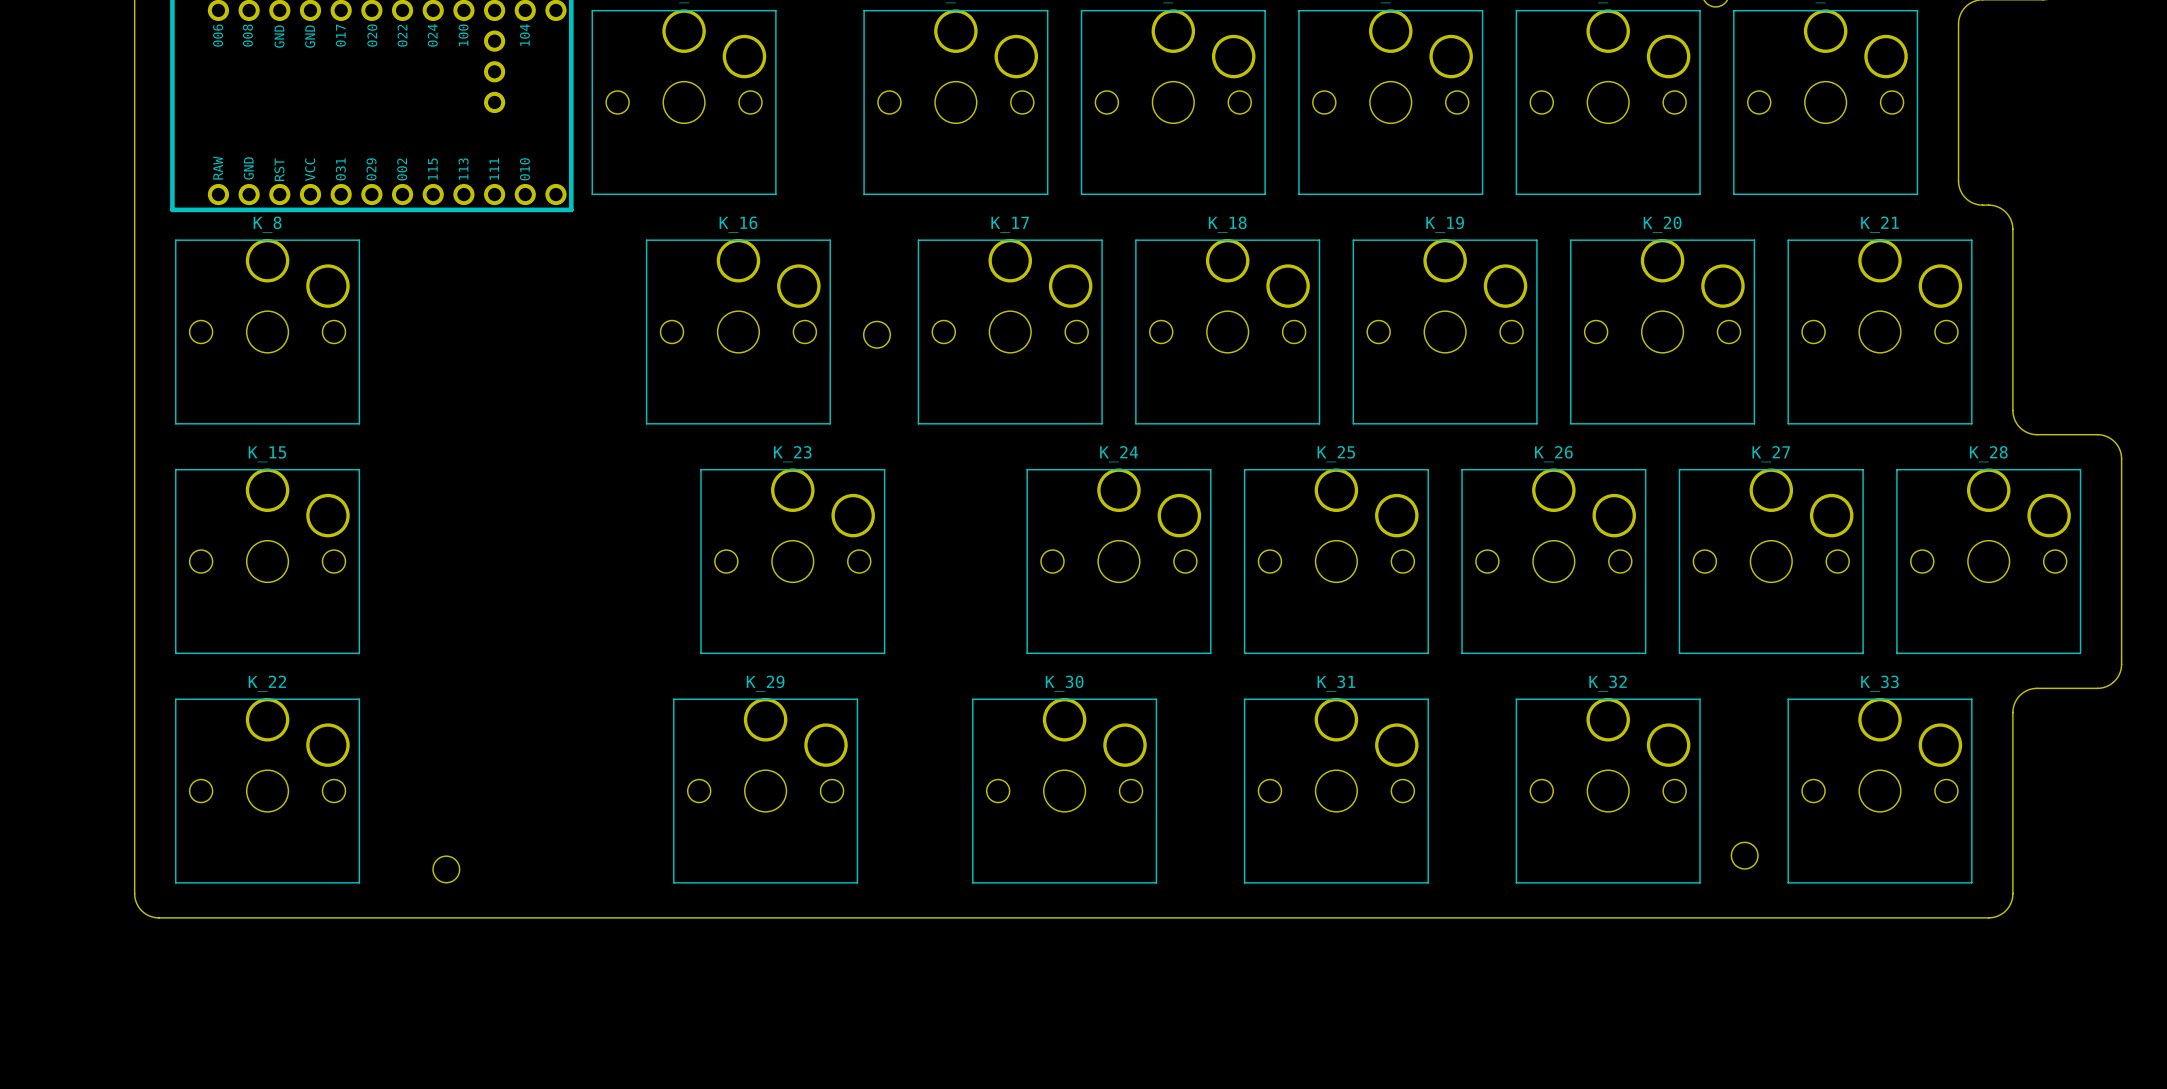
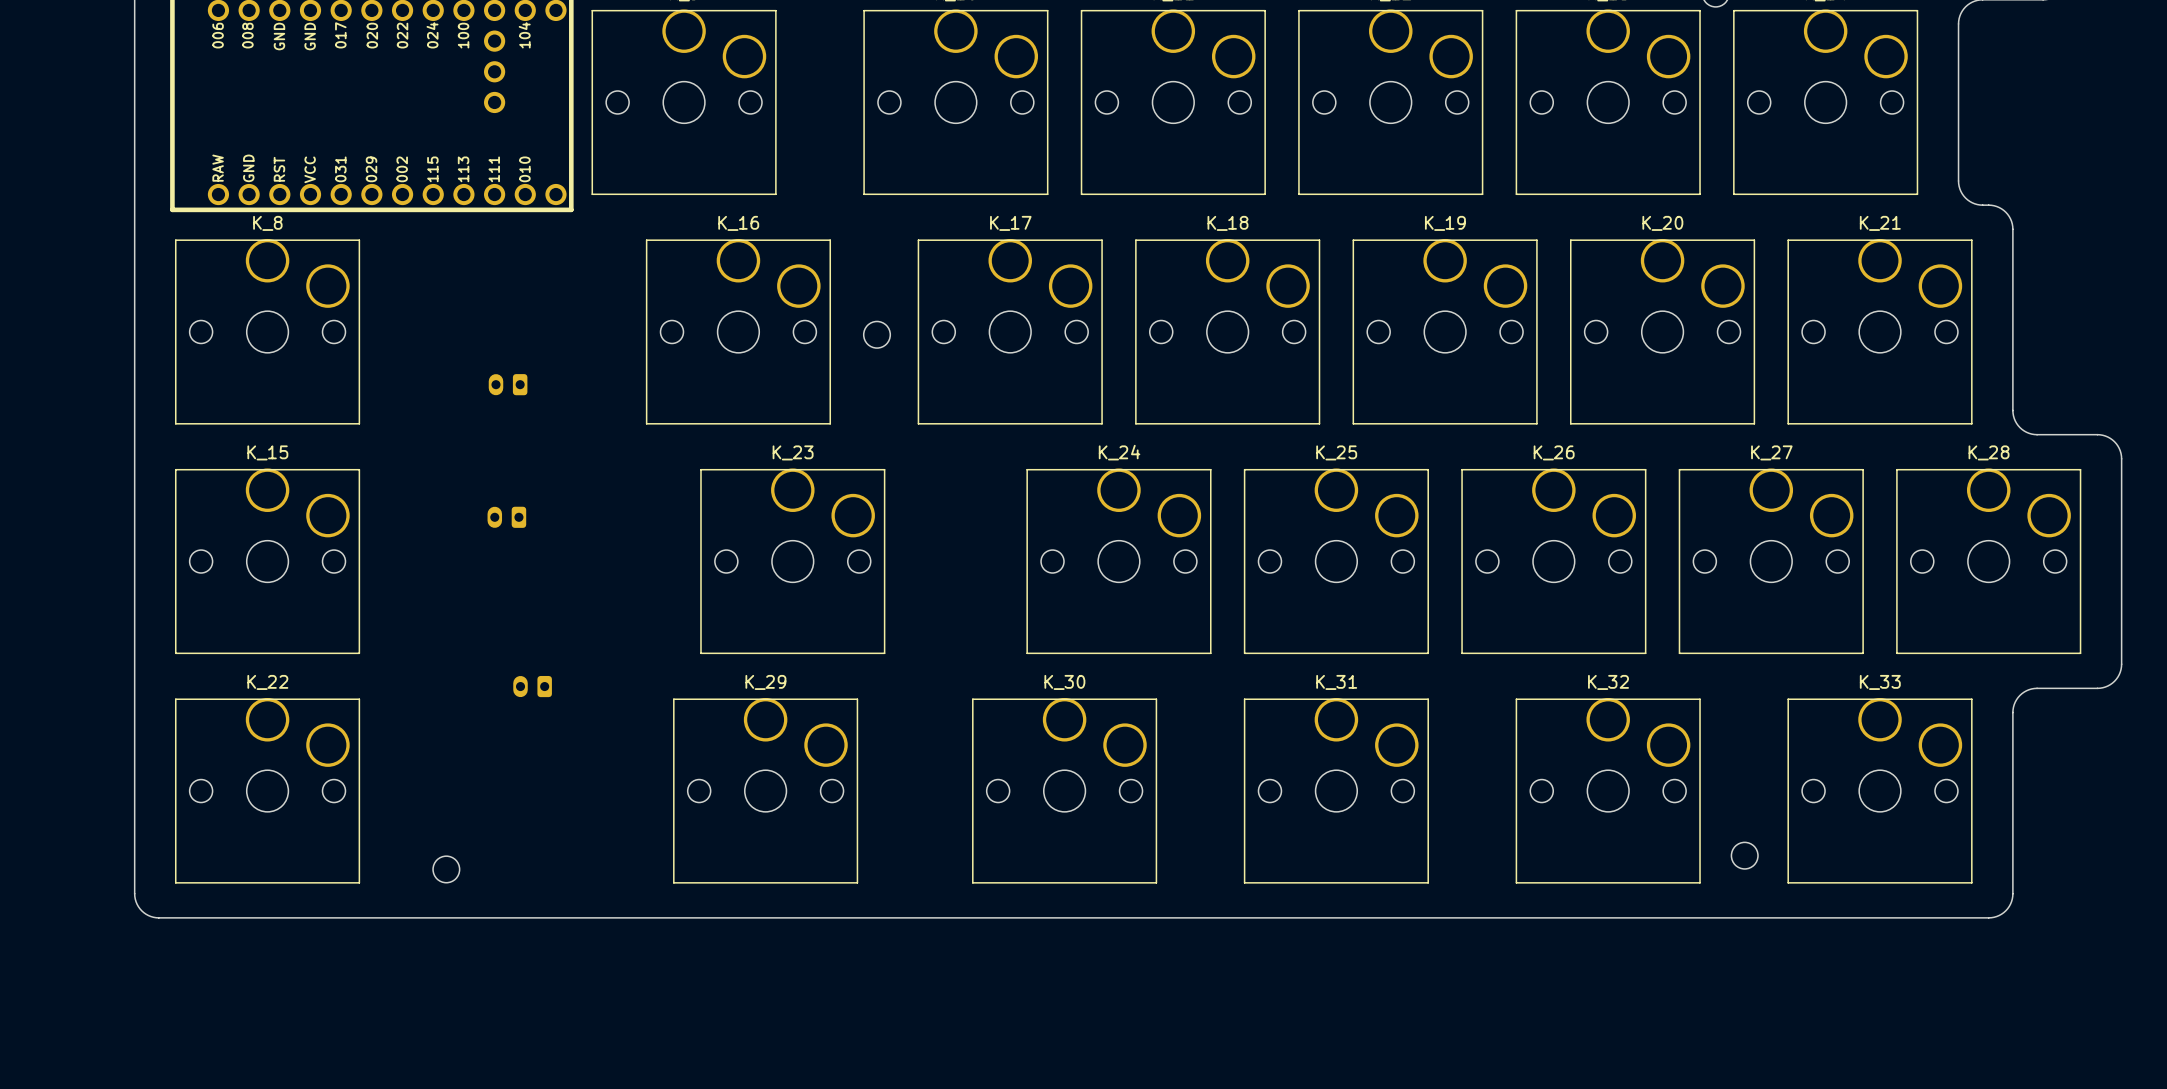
part: none -> (508, 384)
part: none -> (506, 517)
part: none -> (532, 686)

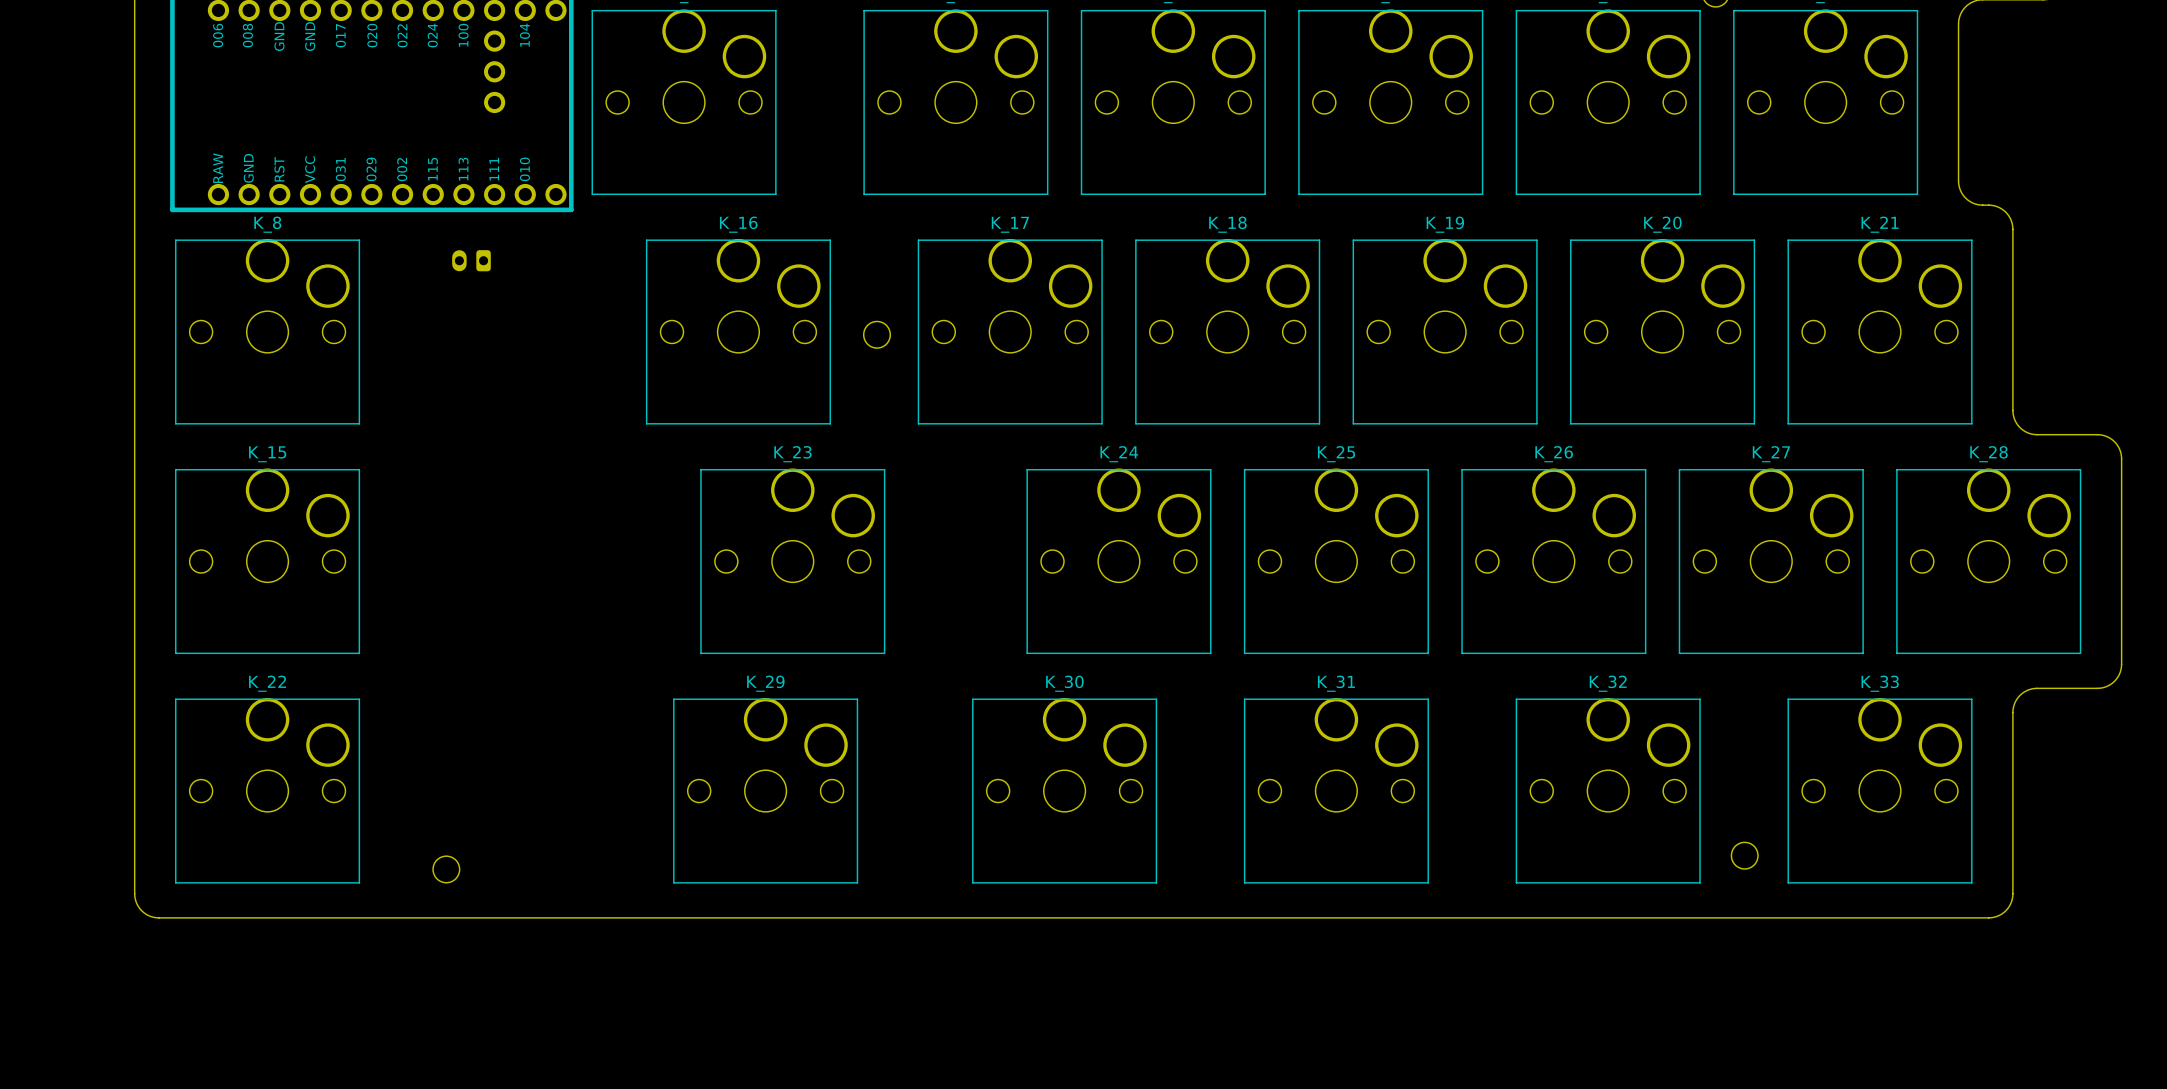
part position: (508, 384) -> (471, 260)
part: (506, 517) -> none
part: (532, 686) -> none

